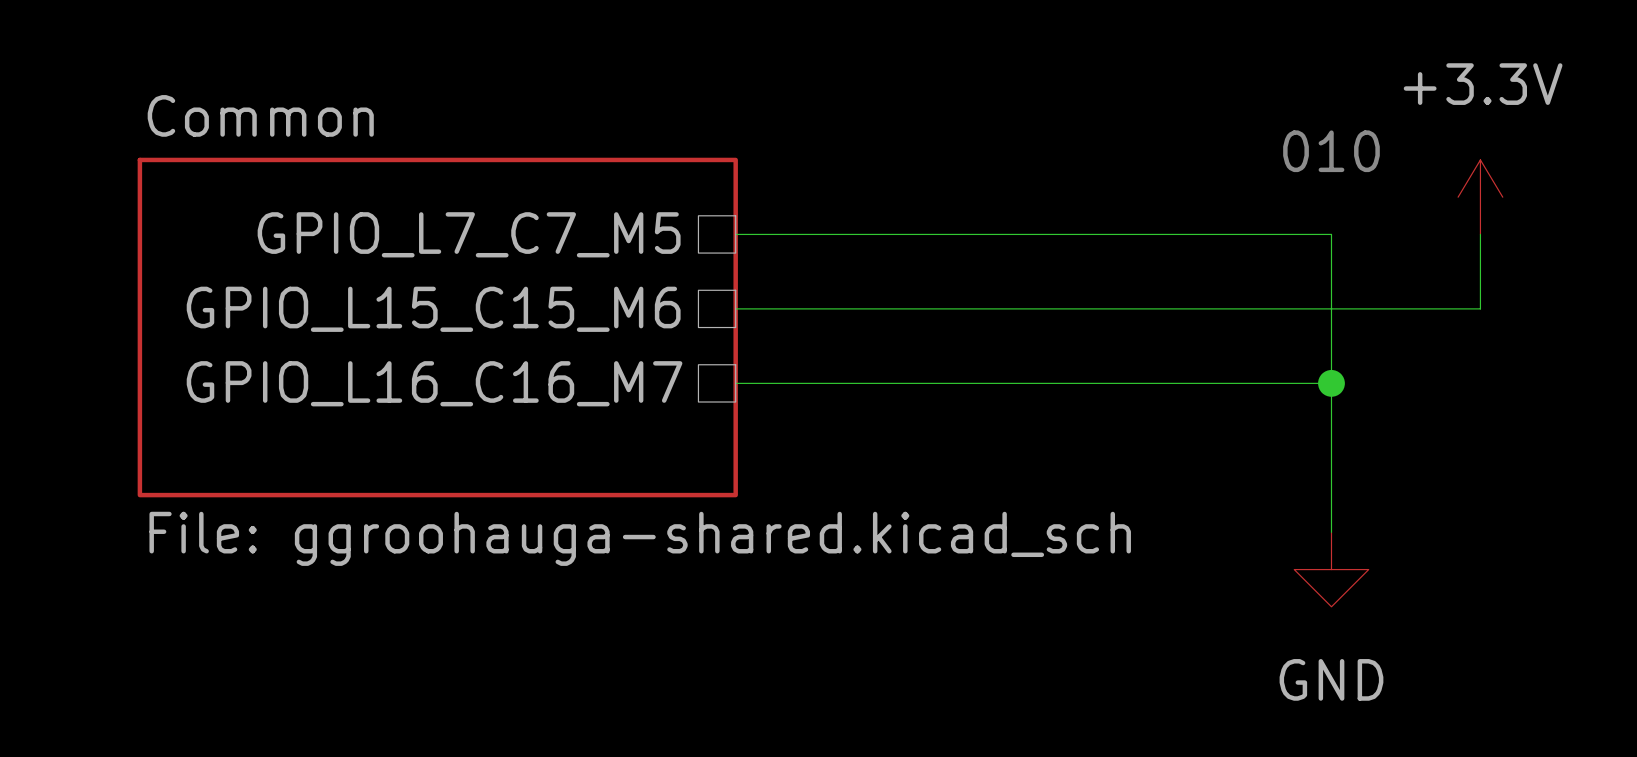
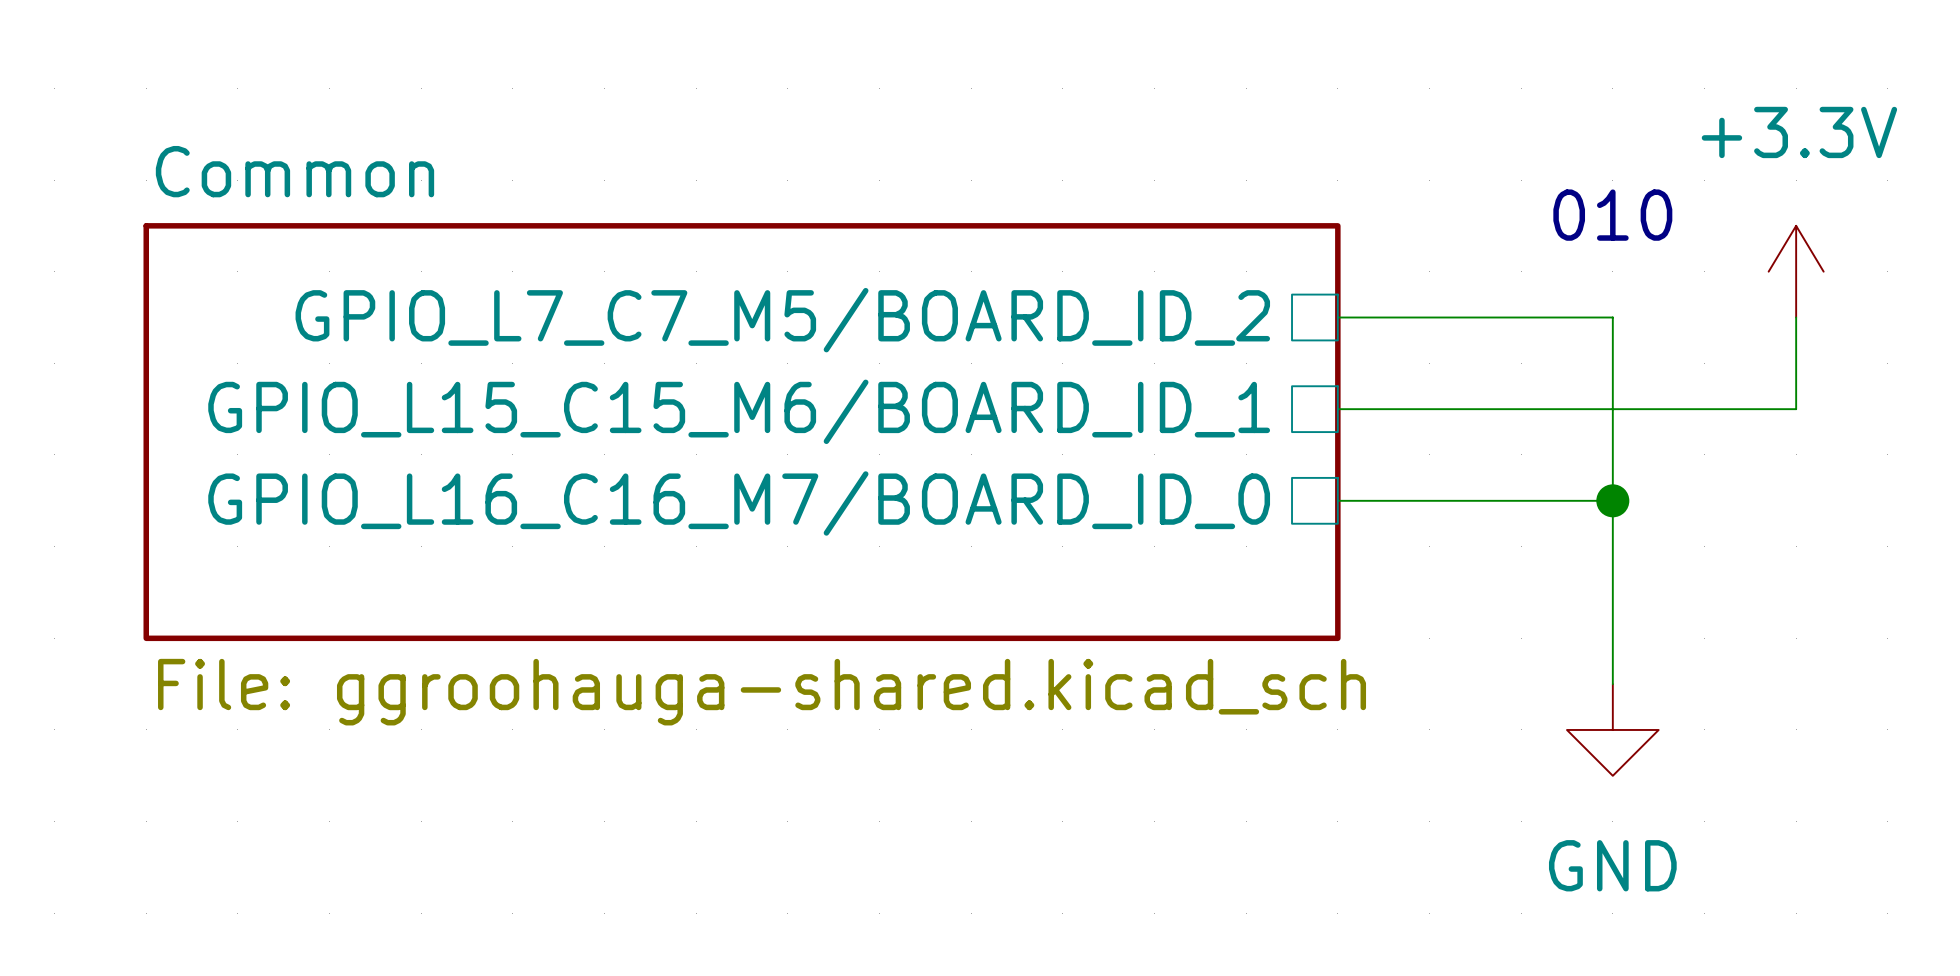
sheet pin: GPIO_L7_C7_M5 (469, 234) -> GPIO_L7_C7_M5/BOARD_ID_2 (782, 320)
wire: (735, 234) (1108, 234) -> none
wire: (735, 308) (1108, 308) -> none
sheet pin: GPIO_L15_C15_M6 (433, 309) -> GPIO_L15_C15_M6/BOARD_ID_1 (739, 411)
sheet Common: File: ggroohauga-shared.kicad_sch (437, 327) -> none
sheet Common: none -> File: ggroohauga-shared.kicad_sch (742, 432)
sheet pin: GPIO_L16_C16_M7 (434, 383) -> GPIO_L16_C16_M7/BOARD_ID_0 (739, 503)
wire: (735, 383) (1108, 383) -> none

